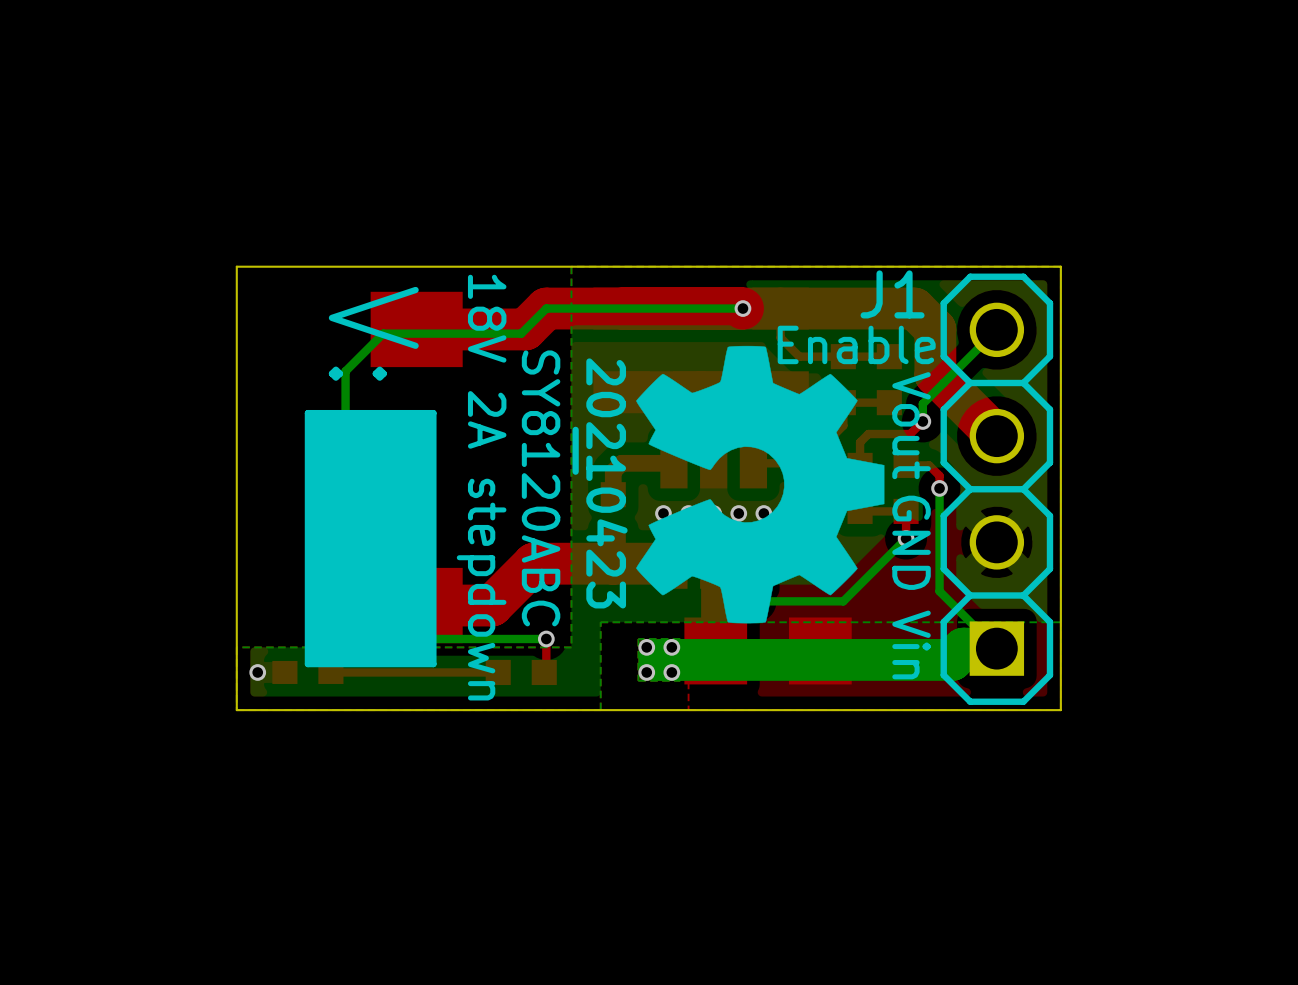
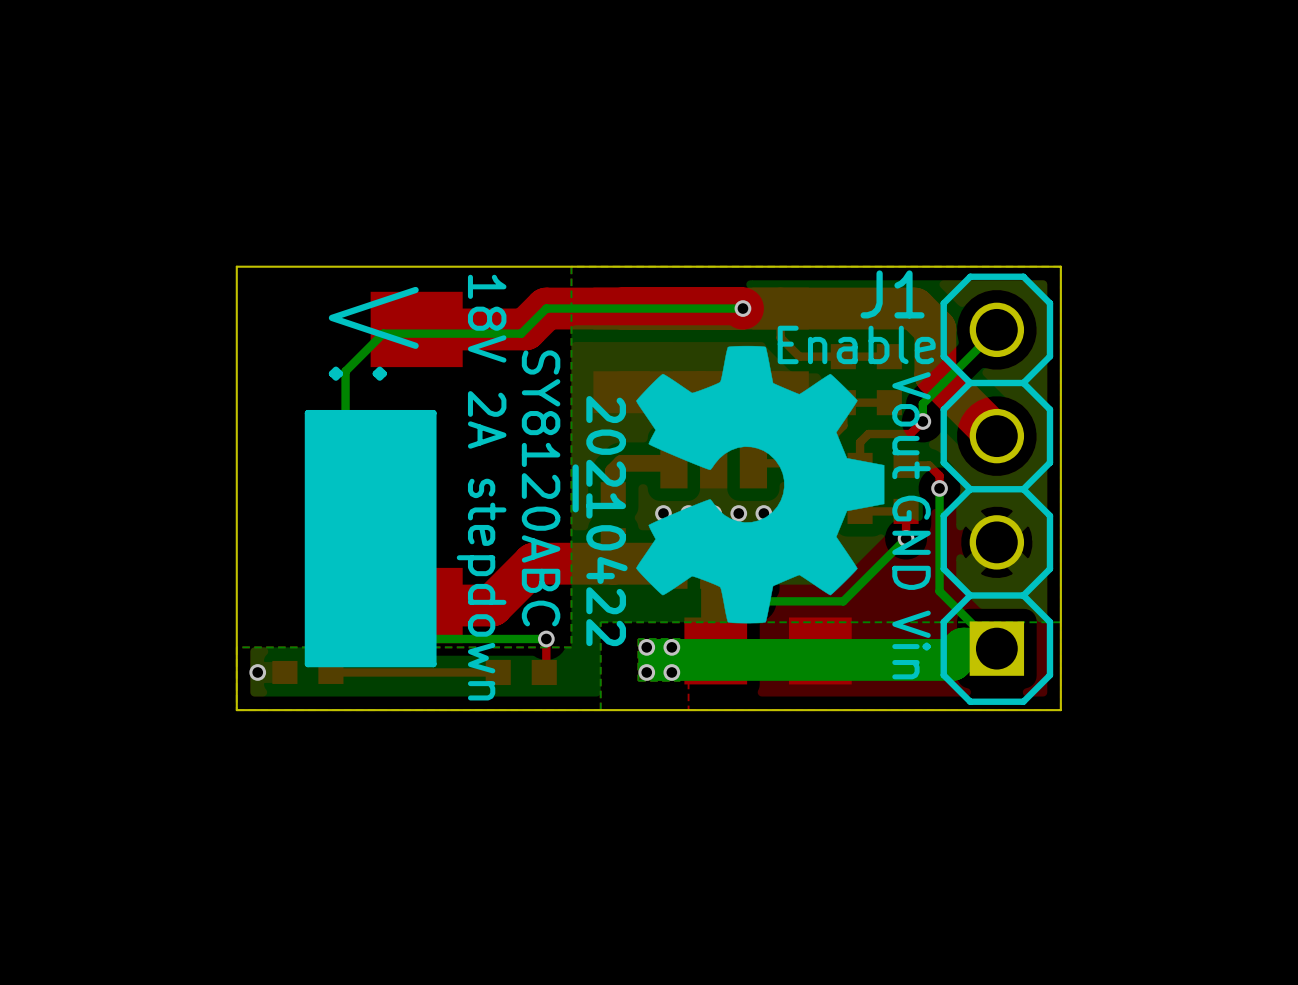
drawing shape: [572, 358, 628, 609] -> [572, 396, 628, 647]

